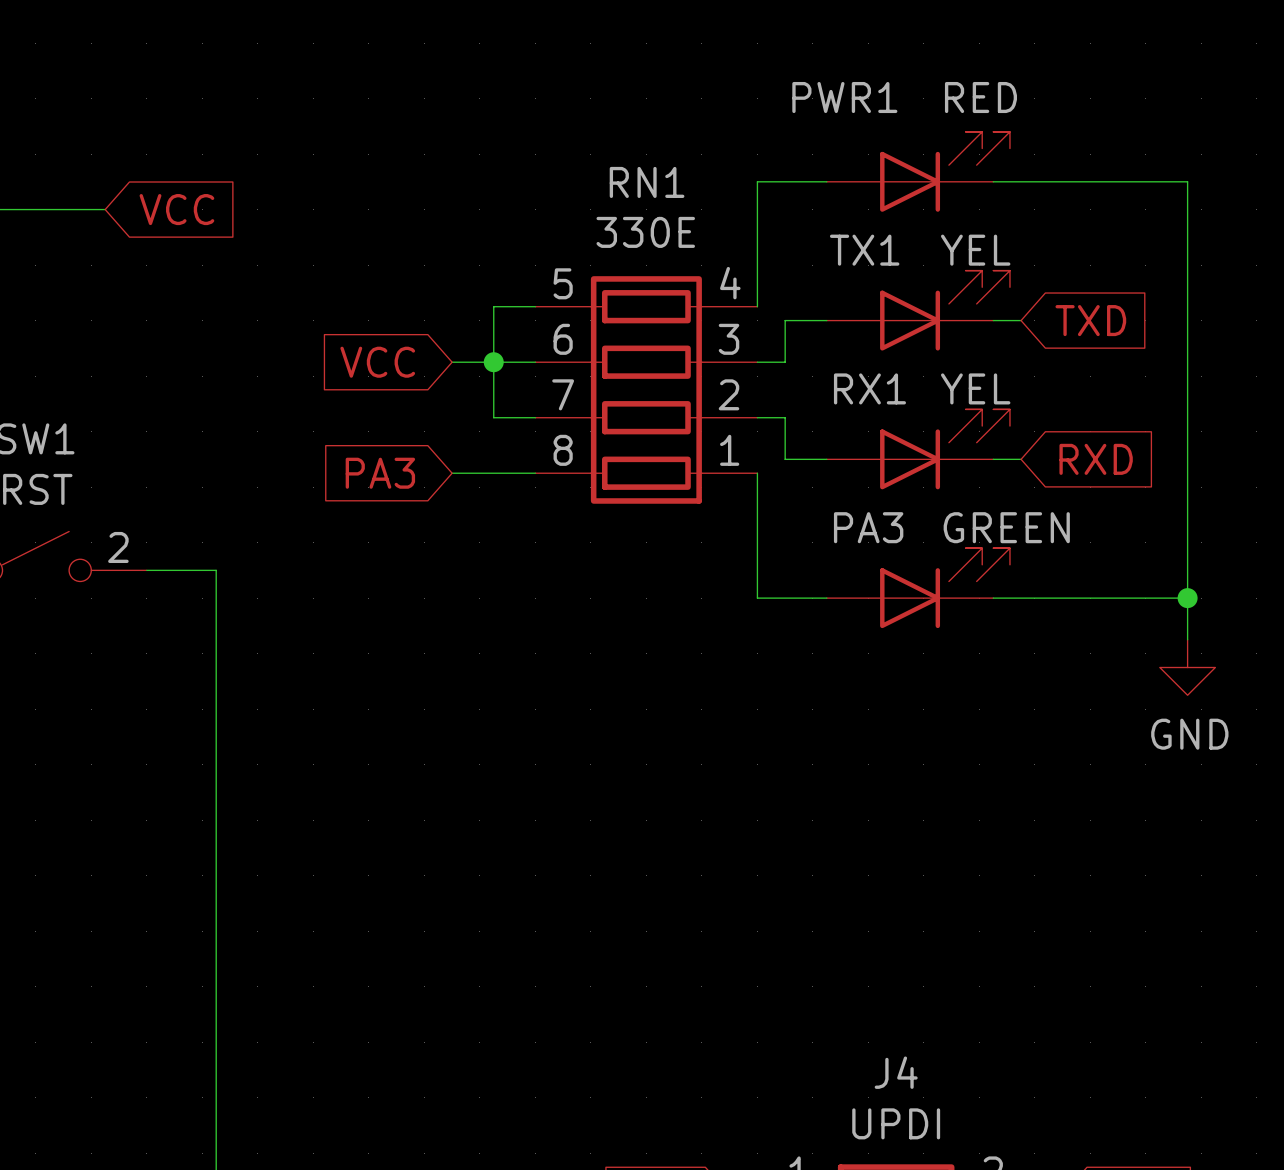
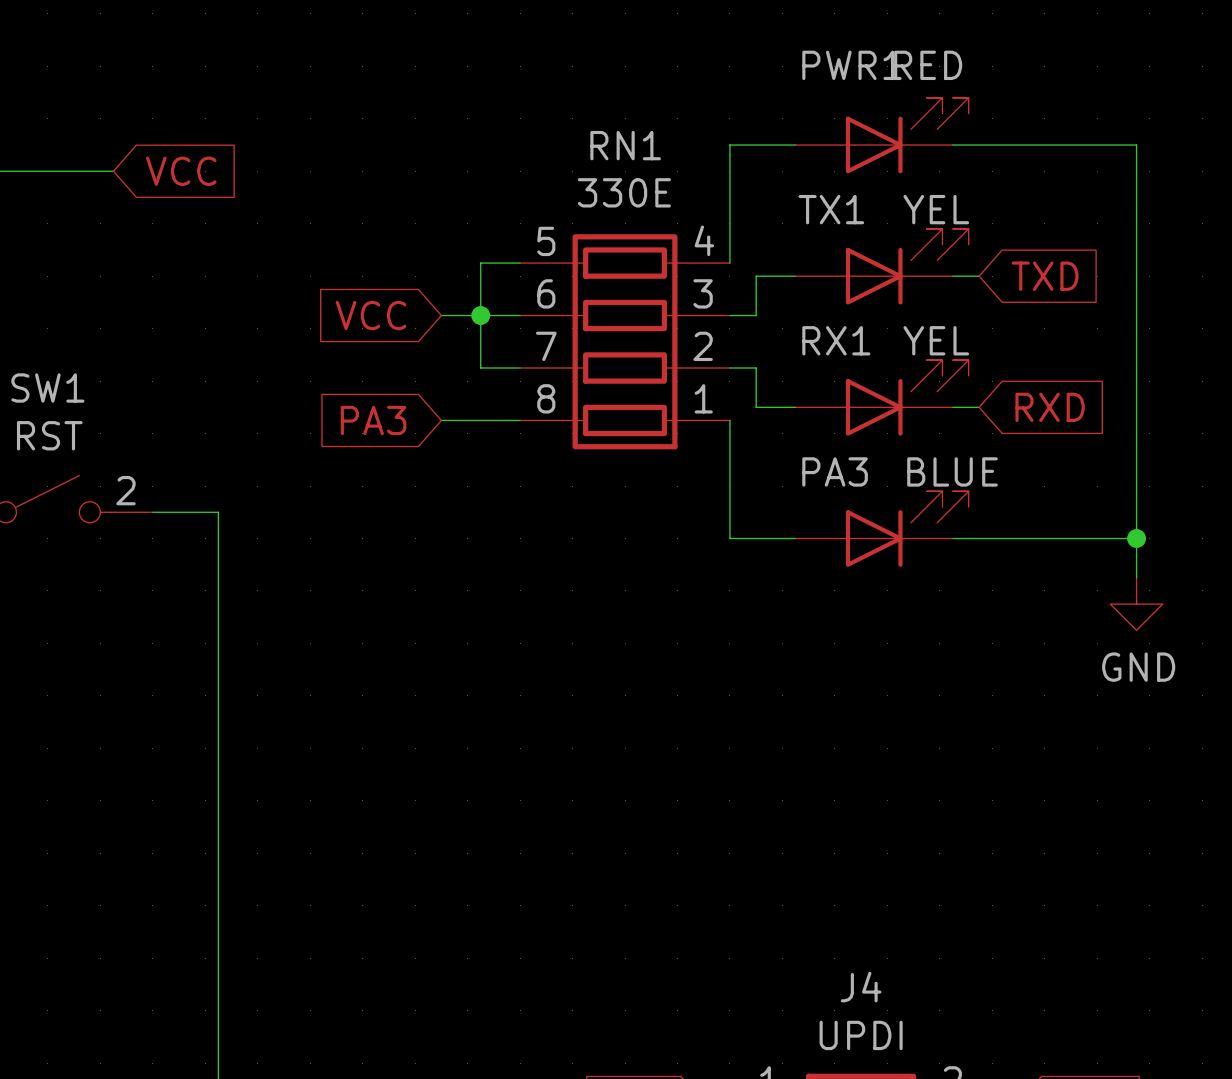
PWR1 name position: PWR1 (844, 97) -> PWR1 (851, 65)
PWR1 value position: RED (980, 97) -> RED (928, 65)
PA3 value: GREEN (1006, 527) -> BLUE (952, 471)

